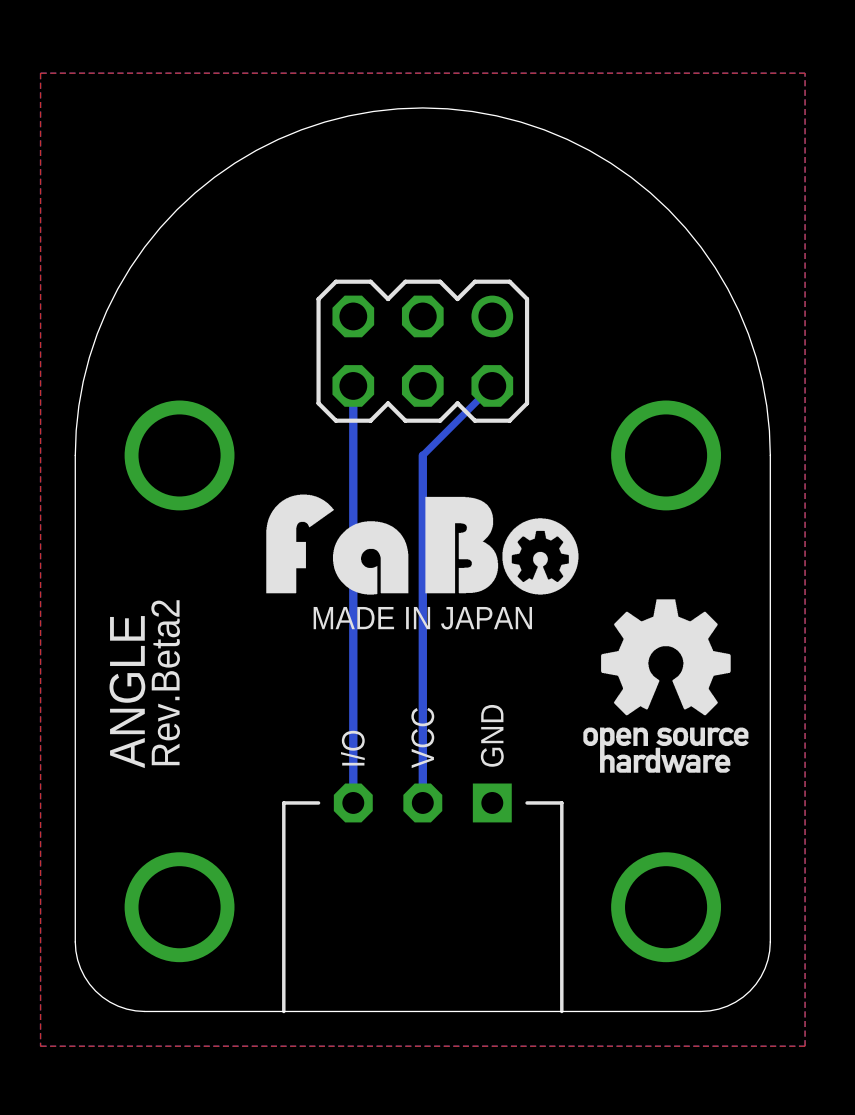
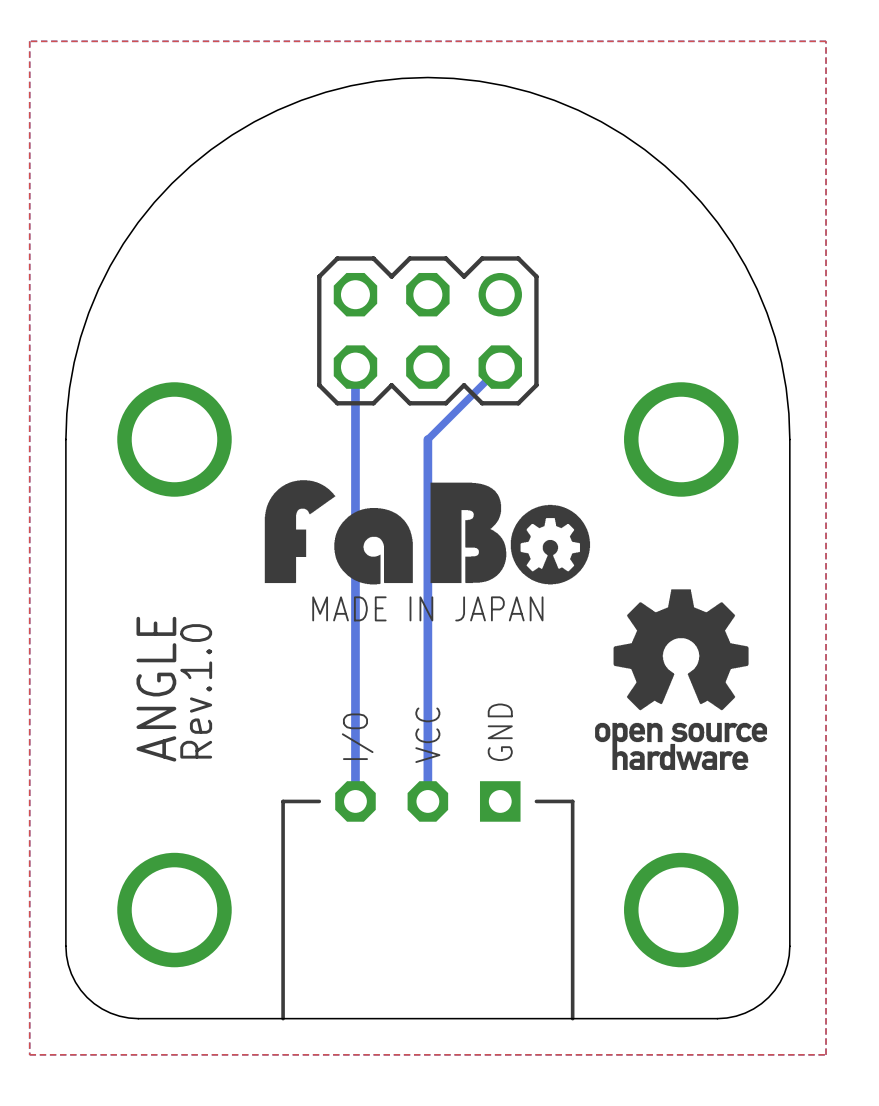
text: Rev.Beta2 (165, 682) -> ANGLE (156, 689)
text: ANGLE (127, 692) -> none
text: none -> Rev.1.0 (196, 691)

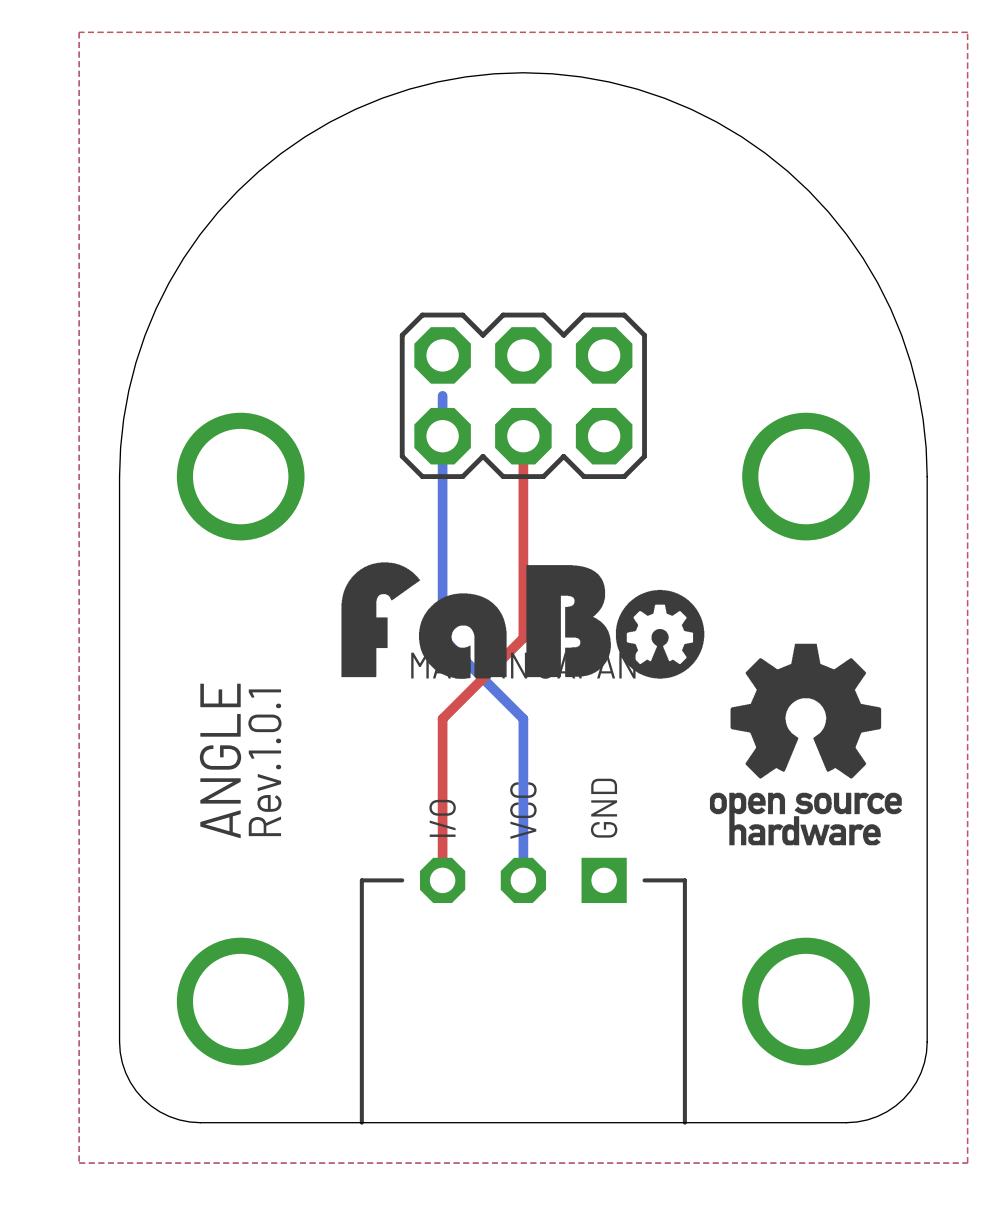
part: (427, 330) -> none
part: none -> (523, 395)
bottom track: (500, 367) (427, 439) (427, 656) -> none
top track: none -> (523, 436) (523, 638) (442, 718) (442, 880)
drawing position: (427, 532) -> (522, 620)
bottom track: (355, 584) (355, 801) -> (442, 638) (523, 718)
text: Rev.1.0 (196, 691) -> Rev.1.0.1 (264, 762)

